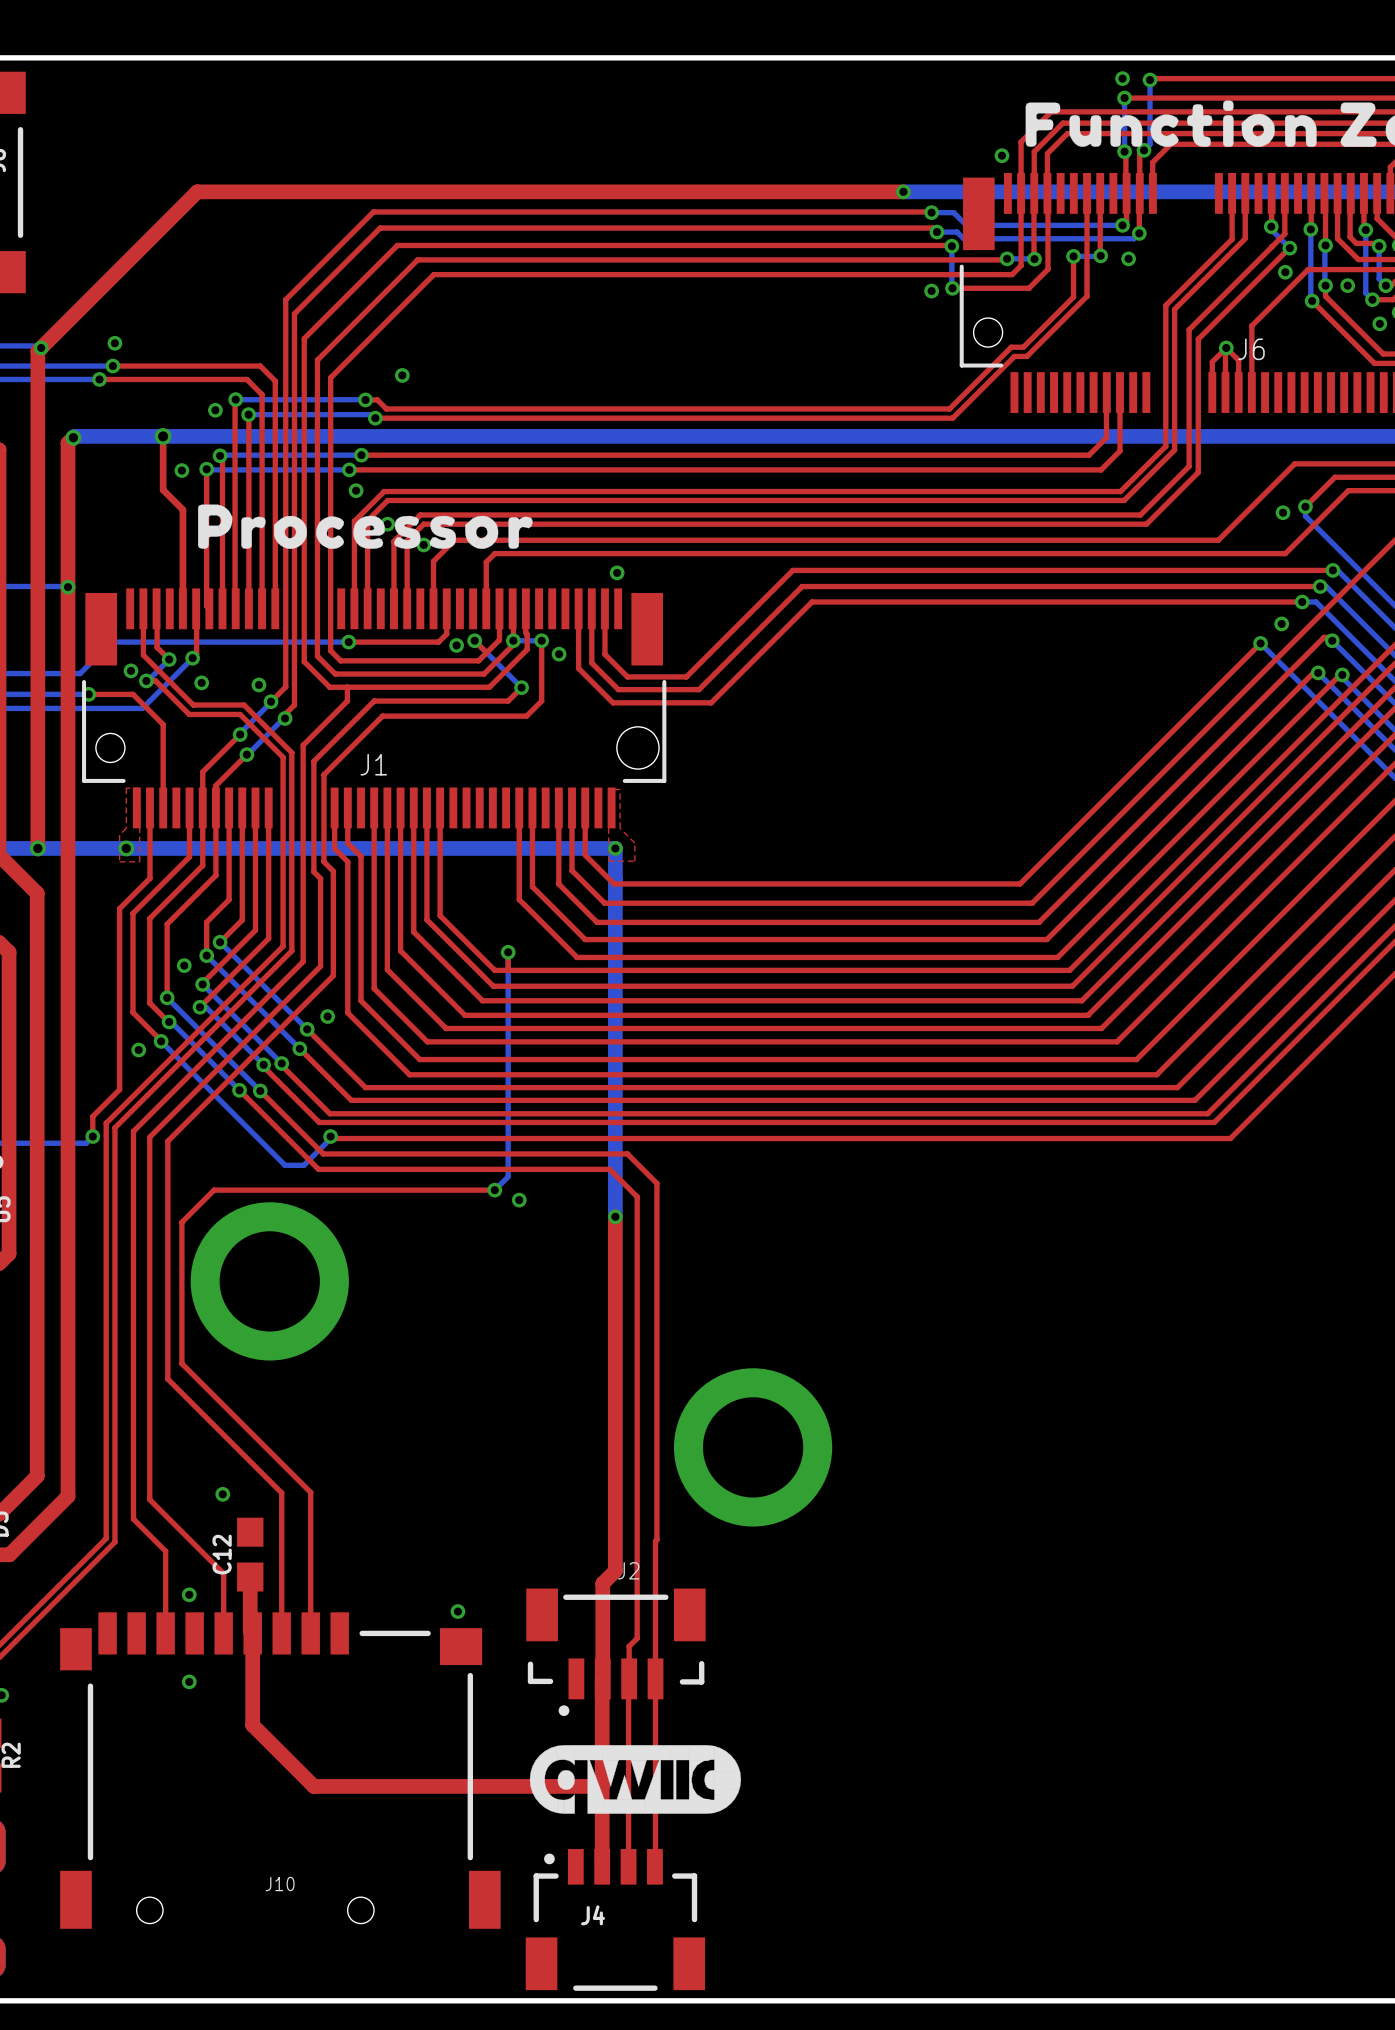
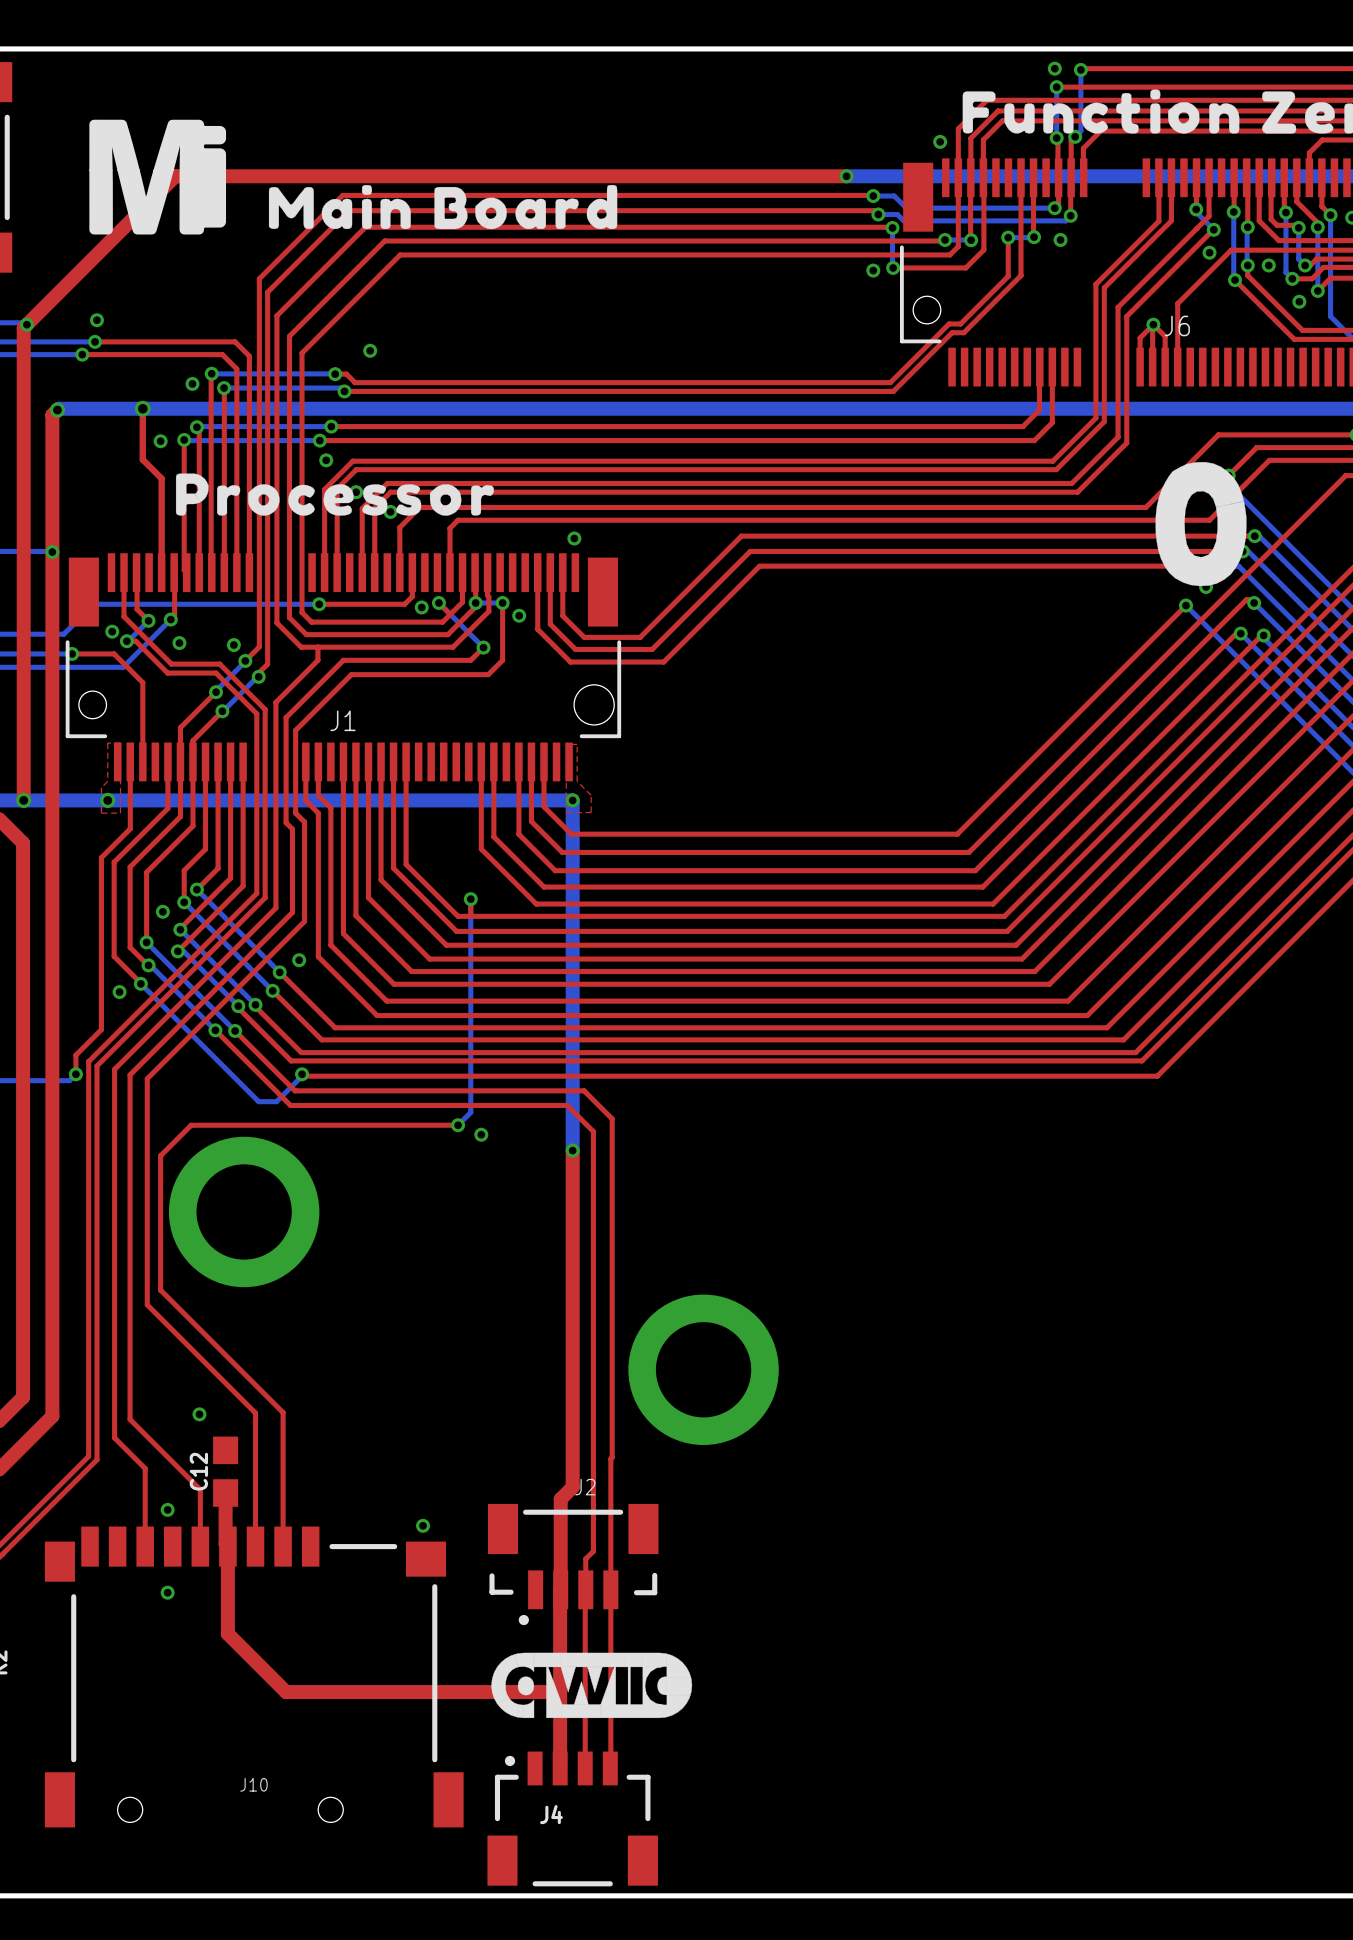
drawing: none -> [89, 119, 227, 235]
drawing: none -> [268, 184, 618, 230]
drawing: none -> [1155, 462, 1247, 587]

